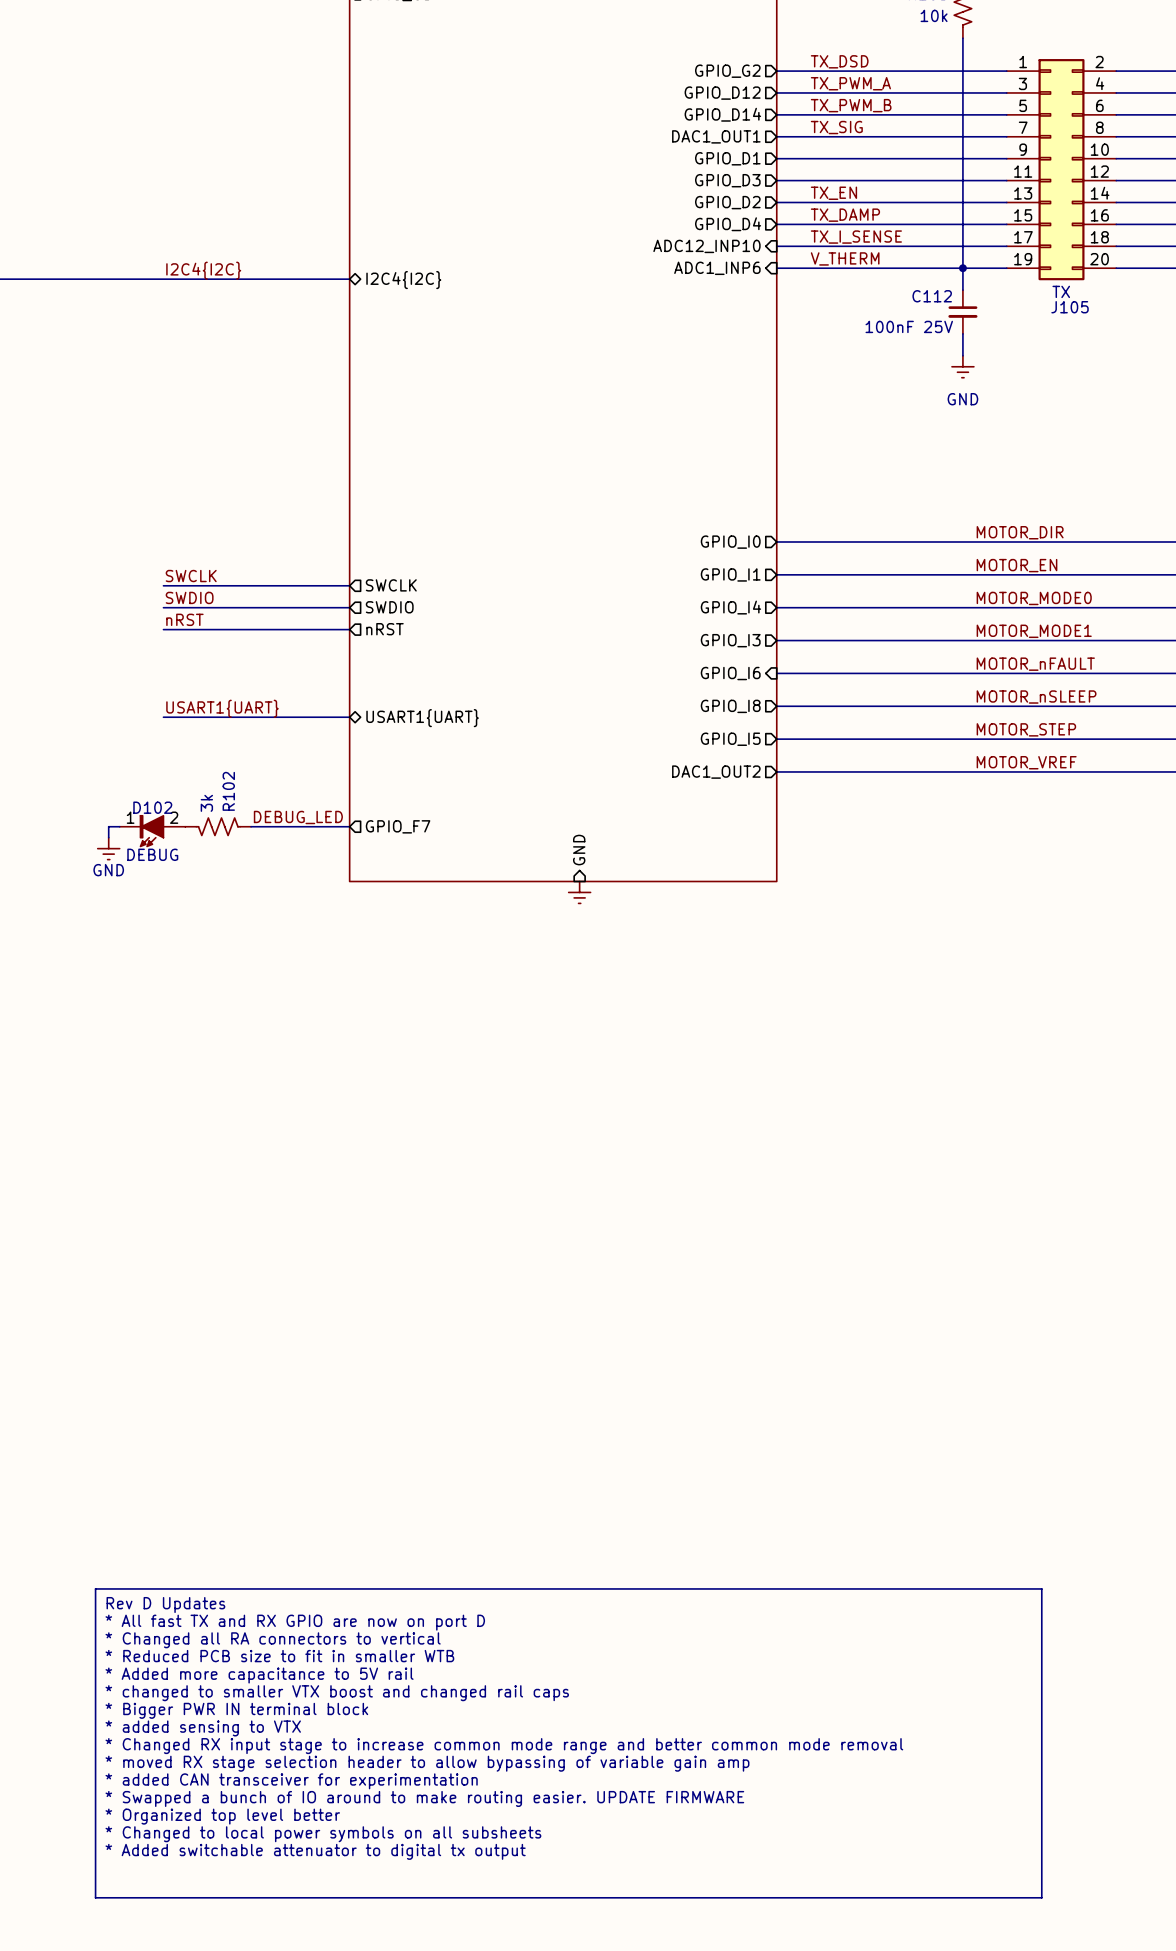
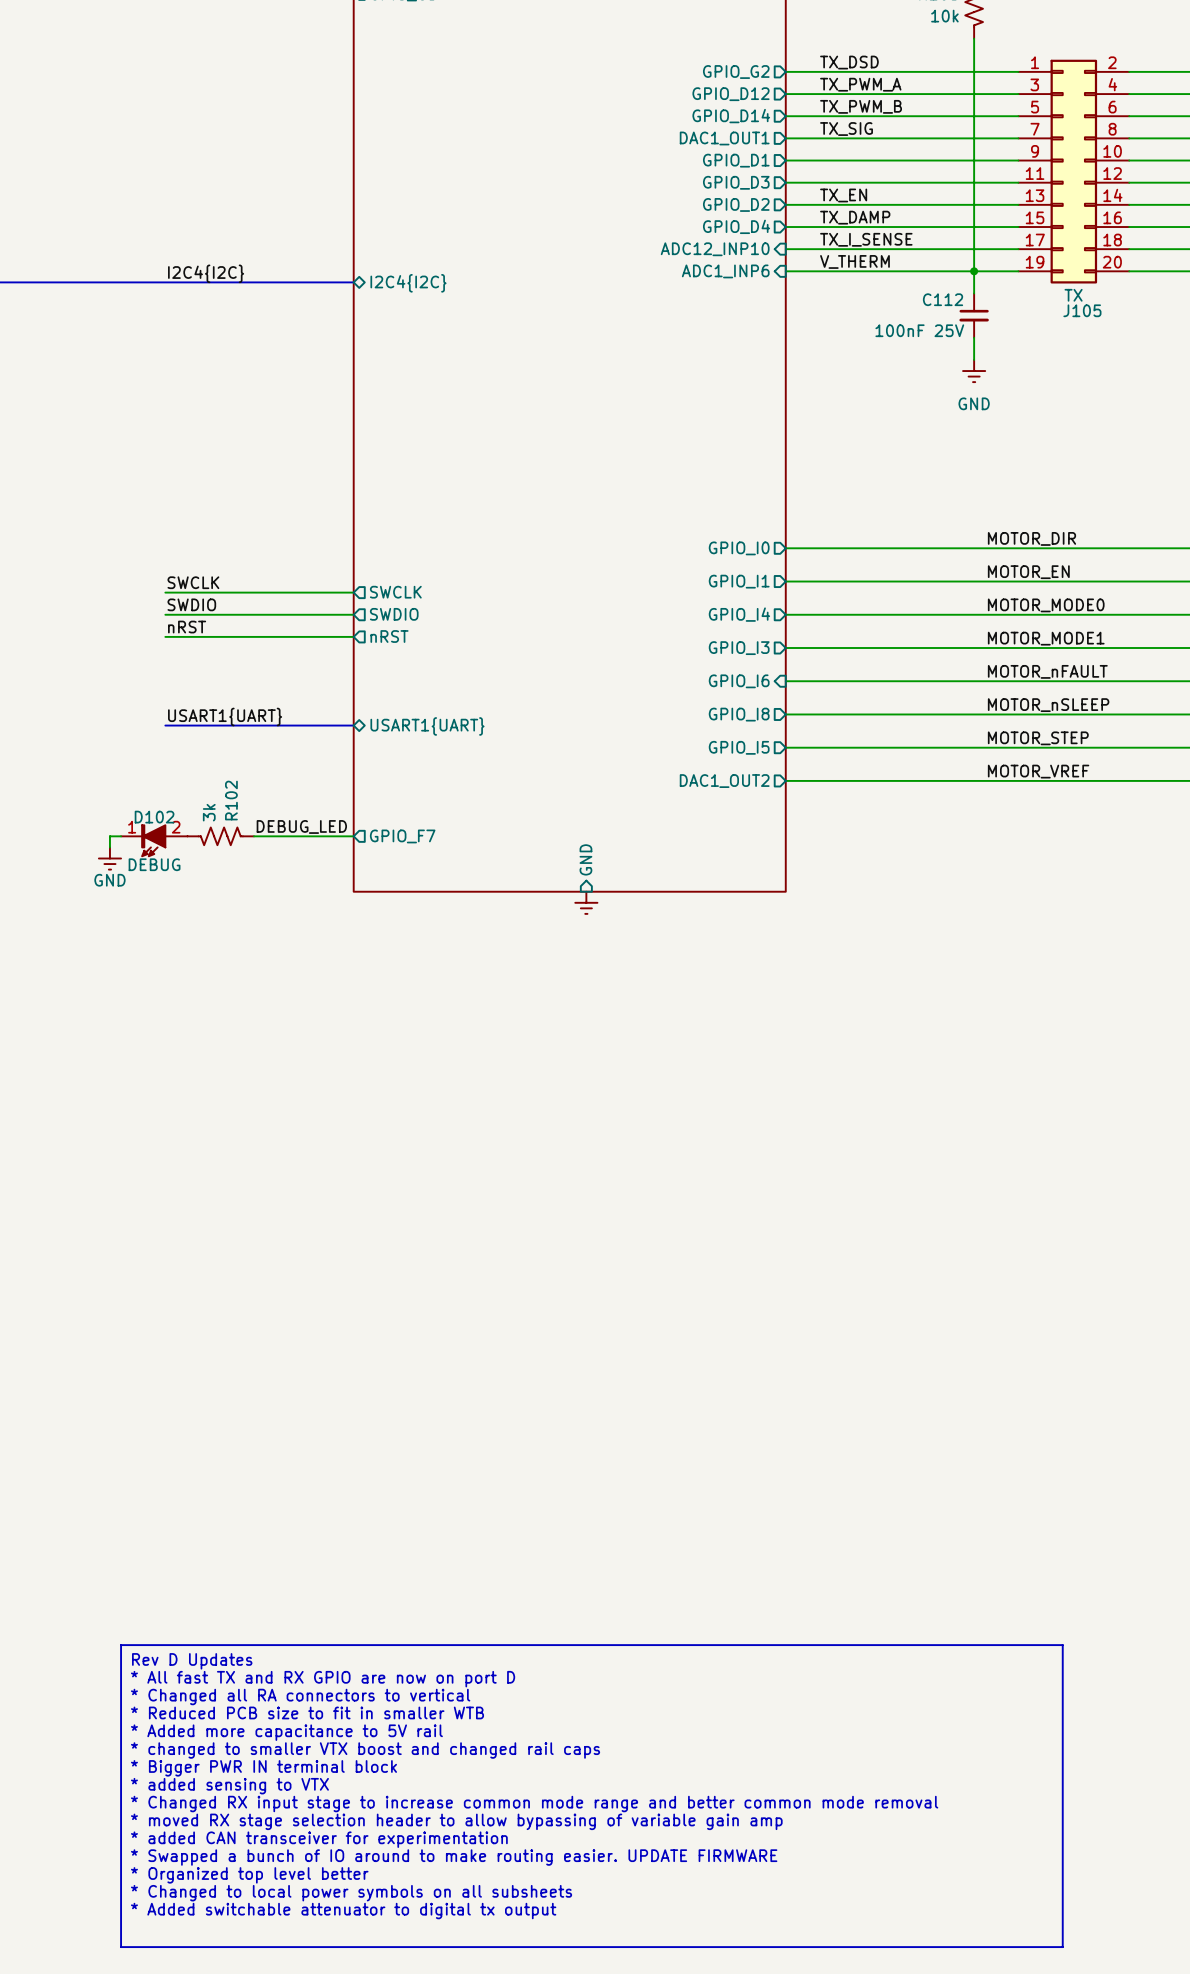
line: (95, 1588) (1041, 1588) (1041, 1897) (95, 1897) (95, 1588) -> (121, 1645) (121, 1947) (1062, 1947) (1062, 1645) (121, 1645)
text position: Rev D Updates (165, 1605) -> Rev D Updates (192, 1661)
text position: * All fast TX and RX GPIO are now on port D (295, 1622) -> * All fast TX and RX GPIO are now on port D (323, 1679)
text position: * Changed all RA connectors to vertical (273, 1640) -> * Changed all RA connectors to vertical (300, 1696)
text position: * Reduced PCB size to fit in smaller WTB (279, 1656) -> * Reduced PCB size to fit in smaller WTB (307, 1712)
text position: * Added more capacitance to 5V rail (259, 1675) -> * Added more capacitance to 5V rail (286, 1732)
text position: * changed to smaller VTX boost and changed rail caps (337, 1693) -> * changed to smaller VTX boost and changed rail caps (365, 1750)
text position: * Bigger PWR IN terminal block (236, 1710) -> * Bigger PWR IN terminal block (263, 1768)
text position: * added sensing to VTX (203, 1728) -> * added sensing to VTX (229, 1786)
text position: * Changed RX input stage to increase common mode range and better common mode removal (504, 1746) -> * Changed RX input stage to increase common mode range and better common mode removal (534, 1804)
text position: * moved RX stage selection header to allow bypassing of variable gain amp (427, 1763) -> * moved RX stage selection header to allow bypassing of variable gain amp (456, 1821)
text position: * added CAN transceiver for experimentation (291, 1781) -> * added CAN transceiver for experimentation (319, 1839)
text position: * Swapped a bunch of IO around to make routing easier. UPDATE FIRMWARE (424, 1798) -> * Swapped a bunch of IO around to make routing easier. UPDATE FIRMWARE (454, 1857)
text position: * Organized top level better (222, 1816) -> * Organized top level better (249, 1875)
text position: * Changed to local power symbols on all subsheets (323, 1834) -> * Changed to local power symbols on all subsheets (351, 1893)
text position: * Added switchable attenuator to digital tx output (315, 1851) -> * Added switchable attenuator to digital tx output (343, 1911)

